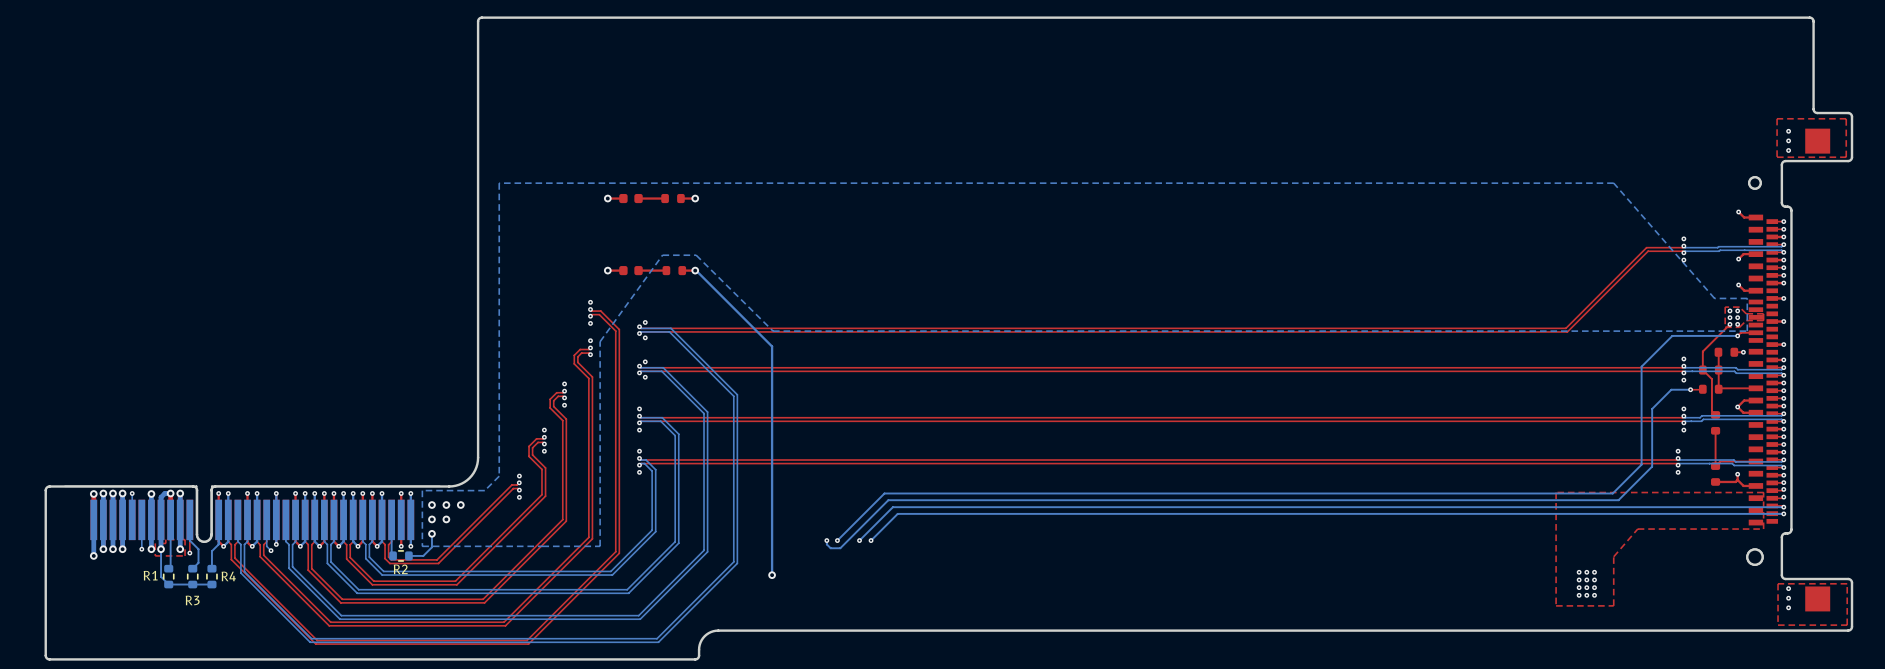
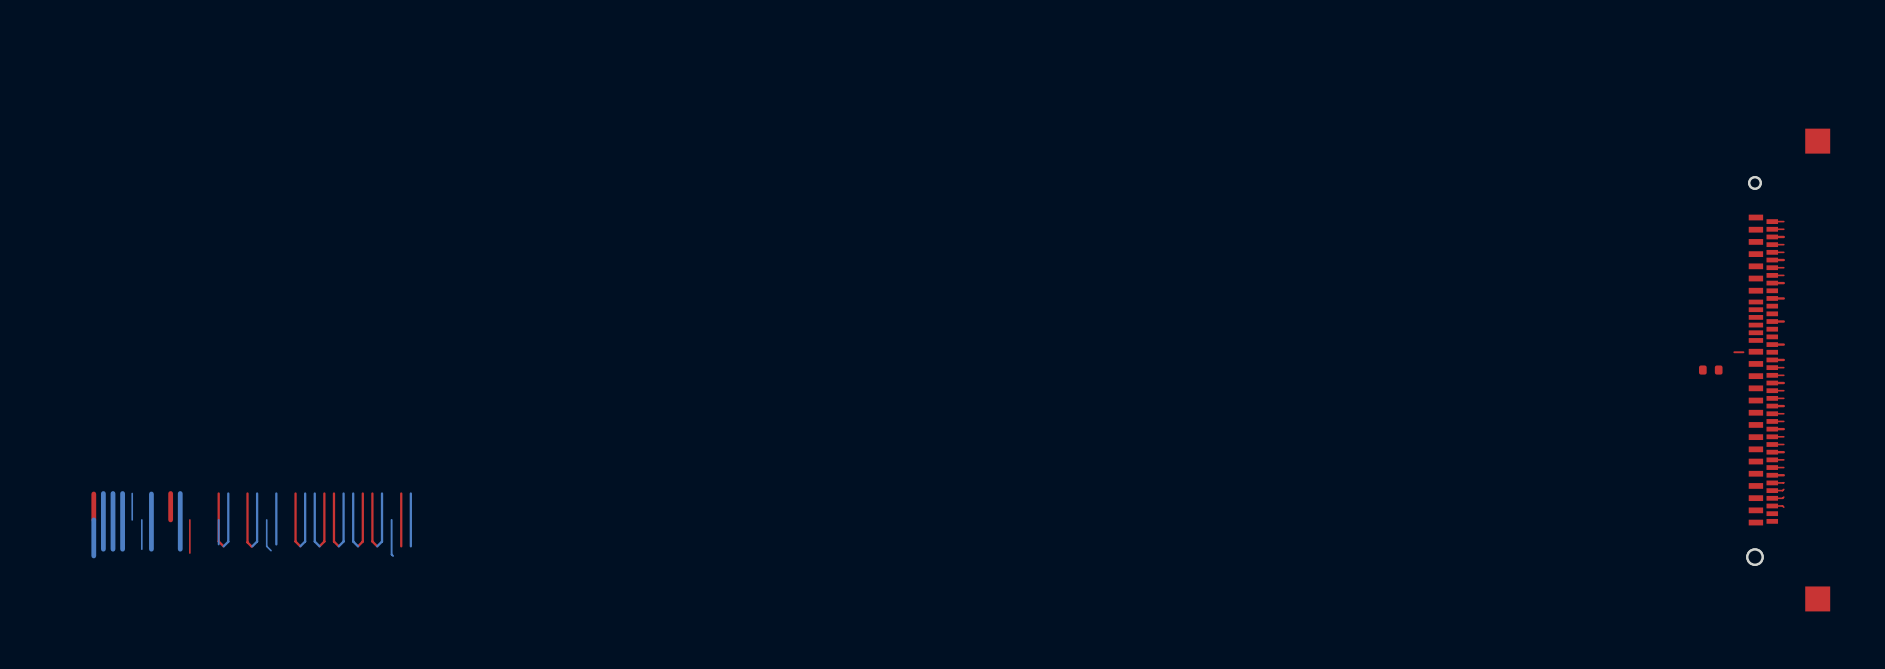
board edge: (1809, 17) (480, 17) (478, 21) (478, 457) (473, 473) (461, 483) (449, 486) (214, 486) (211, 490) (211, 535) (209, 539) (204, 541) (199, 539) (197, 535) (197, 490) (194, 486) (48, 486) (45, 490) (45, 656) (49, 659) (695, 659) (698, 656) (699, 644) (703, 638) (710, 632) (718, 630) (1849, 630) (1852, 626) (1850, 579) (1785, 578) (1781, 575) (1782, 536) (1789, 532) (1791, 529) (1791, 210) (1789, 207) (1781, 203) (1781, 164) (1785, 161) (1848, 161) (1852, 157) (1851, 114) (1816, 113) (1813, 110) (1813, 21) (1809, 17) -> none
top zone outline: (1846, 118) (1846, 157) (1777, 157) (1777, 118) (1846, 118) -> none
via: (1788, 131) -> none
via: (1788, 140) -> none
via: (1788, 150) -> none
bottom zone outline: (1613, 183) (1714, 298) (1747, 298) (1747, 331) (773, 331) (696, 255) (662, 255) (600, 341) (600, 546) (422, 546) (422, 490) (484, 490) (499, 476) (499, 183) (1613, 183) -> none
via: (607, 198) -> none
top track: (623, 198) (607, 198) -> none
part: (630, 198) -> none
top track: (665, 198) (638, 198) -> none
part: (673, 198) -> none
top track: (695, 198) (680, 198) -> none
via: (695, 198) -> none
top track: (1738, 211) (1744, 217) (1755, 217) -> none
via: (1738, 211) -> none
via: (1783, 221) -> none
via: (1783, 229) -> none
via: (1783, 236) -> none
via: (1683, 238) -> none
bottom track: (1783, 244) (1781, 246) (1717, 247) (1685, 247) (1683, 246) -> none
via: (1783, 244) -> none
top track: (1683, 246) (1682, 247) (1646, 247) (1565, 328) (641, 328) (639, 326) -> none
via: (1683, 246) -> none
top track: (1683, 252) (1682, 251) (1648, 251) (1567, 331) (641, 331) (639, 333) -> none
via: (1683, 252) -> none
bottom track: (1783, 252) (1781, 250) (1720, 250) (1683, 252) -> none
via: (1783, 252) -> none
top track: (1755, 254) (1743, 254) (1738, 259) -> none
via: (1738, 259) -> none
via: (1683, 260) -> none
via: (1783, 260) -> none
via: (1783, 267) -> none
via: (607, 270) -> none
top track: (623, 270) (607, 270) -> none
part: (630, 270) -> none
top track: (666, 270) (638, 270) -> none
part: (674, 270) -> none
top track: (695, 270) (682, 270) -> none
bottom track: (695, 270) (772, 346) (772, 575) -> none
via: (695, 270) -> none
via: (1783, 275) -> none
via: (1783, 283) -> none
top track: (1738, 285) (1744, 290) (1755, 290) -> none
via: (1738, 285) -> none
via: (1783, 298) -> none
via: (590, 302) -> none
top zone outline: (1739, 307) (1746, 313) (1763, 313) (1763, 320) (1746, 320) (1739, 327) (1725, 327) (1725, 307) (1739, 307) -> none
top track: (590, 309) (600, 311) (619, 329) (619, 553) (528, 644) (315, 644) (231, 559) (231, 544) (228, 541) (228, 519) -> none
via: (590, 309) -> none
via: (1729, 310) -> none
via: (1737, 310) -> none
top track: (590, 316) (599, 314) (615, 331) (615, 551) (527, 640) (317, 640) (234, 558) (234, 544) (237, 541) (237, 519) -> none
via: (590, 316) -> none
via: (1729, 317) -> none
via: (1737, 317) -> none
via: (1783, 321) -> none
via: (645, 322) -> none
via: (590, 323) -> none
top track: (1729, 324) (1702, 351) (1702, 370) (1711, 379) (1711, 411) (1715, 414) -> none
via: (1729, 324) -> none
via: (1737, 324) -> none
bottom track: (639, 326) (670, 328) (737, 394) (737, 563) (658, 642) (310, 642) (240, 573) (240, 544) (237, 541) (237, 519) -> none
via: (639, 326) -> none
top track: (1755, 332) (1740, 332) (1737, 335) -> none
bottom track: (639, 333) (669, 331) (733, 396) (733, 561) (657, 638) (311, 638) (244, 571) (244, 544) (247, 541) (247, 519) -> none
via: (639, 333) -> none
bottom track: (1737, 335) (1672, 335) (1641, 366) (1641, 464) (1612, 493) (884, 493) (837, 540) -> none
via: (1737, 335) -> none
via: (645, 337) -> none
via: (590, 340) -> none
via: (1783, 344) -> none
top track: (590, 347) (580, 349) (574, 355) (574, 363) (588, 378) (588, 537) (504, 622) (330, 622) (263, 555) (263, 544) (266, 541) (266, 519) -> none
via: (590, 347) -> none
top track: (1718, 352) (1718, 389) (1755, 388) -> none
part: (1726, 352) -> none
via: (1743, 352) -> none
top track: (590, 354) (581, 353) (577, 356) (577, 362) (592, 377) (592, 538) (505, 625) (329, 625) (260, 556) (260, 544) (257, 541) (257, 519) -> none
via: (590, 354) -> none
via: (1683, 358) -> none
via: (1783, 359) -> none
via: (645, 361) -> none
bottom track: (639, 366) (663, 367) (707, 412) (707, 551) (640, 619) (339, 619) (289, 568) (289, 544) (285, 541) (285, 519) -> none
via: (639, 366) -> none
top track: (1683, 366) (1682, 367) (641, 367) (639, 366) -> none
bottom track: (1683, 366) (1685, 367) (1735, 367) (1737, 369) (1781, 369) (1783, 367) -> none
via: (1683, 366) -> none
via: (1783, 367) -> none
bottom track: (639, 372) (661, 371) (704, 413) (704, 550) (638, 615) (341, 615) (292, 566) (295, 519) -> none
via: (639, 372) -> none
top track: (1683, 372) (1682, 371) (641, 371) (639, 372) -> none
bottom track: (1683, 372) (1685, 371) (1734, 371) (1736, 373) (1781, 373) (1783, 375) -> none
via: (1683, 372) -> none
via: (1783, 375) -> none
via: (645, 377) -> none
via: (1683, 380) -> none
via: (564, 383) -> none
via: (1783, 383) -> none
bottom track: (1690, 389) (1671, 389) (1652, 408) (1652, 466) (1618, 500) (888, 500) (840, 548) (830, 548) (826, 544) (826, 540) -> none
via: (1690, 389) -> none
top track: (1702, 389) (1690, 389) -> none
part: (1710, 389) -> none
via: (1783, 390) -> none
top track: (564, 391) (556, 392) (550, 399) (550, 407) (562, 420) (562, 519) (483, 599) (342, 599) (311, 568) (314, 519) -> none
via: (564, 391) -> none
top track: (564, 397) (558, 396) (553, 400) (553, 406) (566, 419) (566, 521) (484, 602) (340, 602) (308, 570) (308, 544) (305, 541) (305, 519) -> none
via: (564, 397) -> none
via: (1783, 398) -> none
top track: (1755, 400) (1744, 400) (1737, 407) (1743, 412) (1755, 412) -> none
via: (564, 405) -> none
via: (1783, 406) -> none
via: (1737, 407) -> none
via: (639, 408) -> none
via: (1683, 408) -> none
bottom track: (1783, 413) (1781, 415) (1701, 415) (1700, 417) (1683, 416) -> none
via: (1783, 413) -> none
bottom track: (639, 416) (662, 417) (678, 434) (678, 543) (628, 593) (357, 593) (327, 563) (324, 519) -> none
via: (639, 416) -> none
top track: (1683, 416) (1682, 417) (641, 417) (639, 416) -> none
via: (1683, 416) -> none
bottom track: (1783, 421) (1781, 419) (1703, 419) (1701, 421) (1683, 422) -> none
via: (1783, 421) -> none
bottom track: (639, 422) (660, 421) (675, 435) (675, 541) (627, 589) (358, 589) (330, 561) (330, 544) (333, 541) (333, 519) -> none
via: (639, 422) -> none
top track: (1683, 422) (1682, 421) (641, 421) (639, 422) -> none
via: (1683, 422) -> none
part: (1715, 422) -> none
via: (1783, 429) -> none
via: (544, 430) -> none
via: (639, 430) -> none
via: (1683, 430) -> none
top track: (1715, 430) (1715, 466) (1720, 461) (1755, 461) -> none
via: (1783, 436) -> none
top track: (544, 437) (536, 438) (529, 446) (529, 456) (541, 469) (541, 494) (455, 581) (373, 581) (350, 557) (350, 544) (353, 541) (353, 519) -> none
via: (544, 437) -> none
top track: (544, 444) (538, 442) (532, 447) (532, 454) (545, 467) (545, 496) (456, 584) (372, 584) (346, 559) (346, 544) (343, 541) (343, 519) -> none
via: (544, 444) -> none
via: (1783, 444) -> none
via: (544, 451) -> none
via: (639, 451) -> none
via: (1678, 451) -> none
via: (1783, 452) -> none
bottom track: (639, 458) (646, 460) (655, 469) (655, 531) (612, 575) (382, 575) (365, 558) (365, 544) (362, 541) (362, 519) -> none
via: (639, 458) -> none
top track: (1678, 458) (1676, 460) (641, 460) (639, 458) -> none
bottom track: (1678, 458) (1679, 460) (1733, 460) (1735, 461) (1781, 461) (1783, 459) -> none
via: (1678, 458) -> none
via: (1783, 459) -> none
bottom track: (639, 465) (644, 463) (652, 471) (652, 530) (610, 571) (383, 571) (369, 557) (369, 544) (372, 541) (372, 519) -> none
via: (639, 465) -> none
top track: (1678, 465) (1676, 463) (641, 463) (639, 465) -> none
bottom track: (1678, 465) (1679, 463) (1732, 463) (1734, 465) (1781, 465) (1783, 467) -> none
via: (1678, 465) -> none
via: (1783, 467) -> none
via: (639, 472) -> none
via: (1678, 472) -> none
part: (1715, 474) -> none
top track: (1737, 474) (1737, 480) -> none
via: (1737, 474) -> none
via: (1783, 475) -> none
via: (519, 476) -> none
top track: (1737, 480) (1743, 485) (1755, 485) -> none
top track: (1737, 480) (1735, 481) (1715, 481) -> none
top track: (519, 482) (511, 484) (437, 559) (391, 559) (388, 557) (388, 544) (391, 541) (391, 519) -> none
via: (519, 482) -> none
via: (1783, 482) -> none
via: (1783, 489) -> none
top track: (519, 490) (513, 488) (438, 563) (389, 563) (385, 558) (385, 544) (382, 541) (382, 519) -> none
via: (519, 490) -> none
top zone outline: (1763, 492) (1763, 529) (1637, 529) (1613, 556) (1613, 605) (1556, 605) (1556, 492) (1763, 492) -> none
via: (93, 493) -> none
via: (103, 493) -> none
via: (112, 493) -> none
via: (122, 493) -> none
via: (132, 493) -> none
via: (151, 493) -> none
bottom track: (170, 493) (164, 493) (161, 497) (161, 576) (168, 584) (211, 584) -> none
via: (170, 493) -> none
via: (180, 493) -> none
via: (218, 493) -> none
via: (228, 493) -> none
via: (247, 493) -> none
via: (257, 493) -> none
via: (276, 493) -> none
via: (295, 493) -> none
via: (305, 493) -> none
via: (314, 493) -> none
via: (324, 493) -> none
via: (333, 493) -> none
via: (343, 493) -> none
via: (353, 493) -> none
via: (362, 493) -> none
via: (372, 493) -> none
via: (382, 493) -> none
via: (401, 493) -> none
via: (410, 493) -> none
via: (519, 497) -> none
via: (1783, 497) -> none
via: (431, 505) -> none
via: (446, 505) -> none
via: (460, 505) -> none
bottom track: (1783, 507) (892, 507) (859, 540) -> none
via: (1783, 507) -> none
bottom track: (1783, 513) (897, 513) (871, 540) -> none
via: (1783, 513) -> none
part: (252, 514) -> none
bottom track: (170, 519) (170, 566) (168, 568) -> none
bottom track: (189, 519) (189, 540) (198, 549) (198, 562) (192, 568) -> none
via: (431, 519) -> none
via: (446, 519) -> none
bottom track: (431, 533) (431, 547) (423, 555) (408, 555) -> none
via: (431, 533) -> none
top zone outline: (185, 539) (185, 555) (155, 555) (155, 543) (165, 543) (165, 539) (185, 539) -> none
via: (826, 540) -> none
via: (837, 540) -> none
via: (859, 540) -> none
via: (871, 540) -> none
bottom track: (218, 543) (211, 551) (211, 568) -> none
via: (276, 544) -> none
via: (223, 546) -> none
via: (252, 546) -> none
via: (300, 546) -> none
via: (319, 546) -> none
via: (338, 546) -> none
via: (357, 546) -> none
via: (377, 546) -> none
via: (401, 546) -> none
via: (410, 546) -> none
via: (103, 549) -> none
via: (112, 549) -> none
via: (122, 549) -> none
via: (141, 549) -> none
via: (151, 549) -> none
via: (161, 549) -> none
via: (180, 549) -> none
via: (271, 550) -> none
via: (189, 553) -> none
via: (93, 555) -> none
R2: (400, 555) -> none
via: (1579, 572) -> none
via: (1586, 572) -> none
via: (1594, 572) -> none
via: (772, 575) -> none
R1: (168, 576) -> none
R3: (192, 576) -> none
R4: (211, 576) -> none
via: (1579, 579) -> none
via: (1586, 579) -> none
via: (1594, 579) -> none
top zone outline: (1847, 583) (1847, 625) (1778, 625) (1778, 583) (1847, 583) -> none
via: (1579, 587) -> none
via: (1586, 587) -> none
via: (1594, 587) -> none
via: (1788, 588) -> none
via: (1579, 595) -> none
via: (1586, 595) -> none
via: (1594, 595) -> none
via: (1788, 598) -> none
via: (1788, 607) -> none

